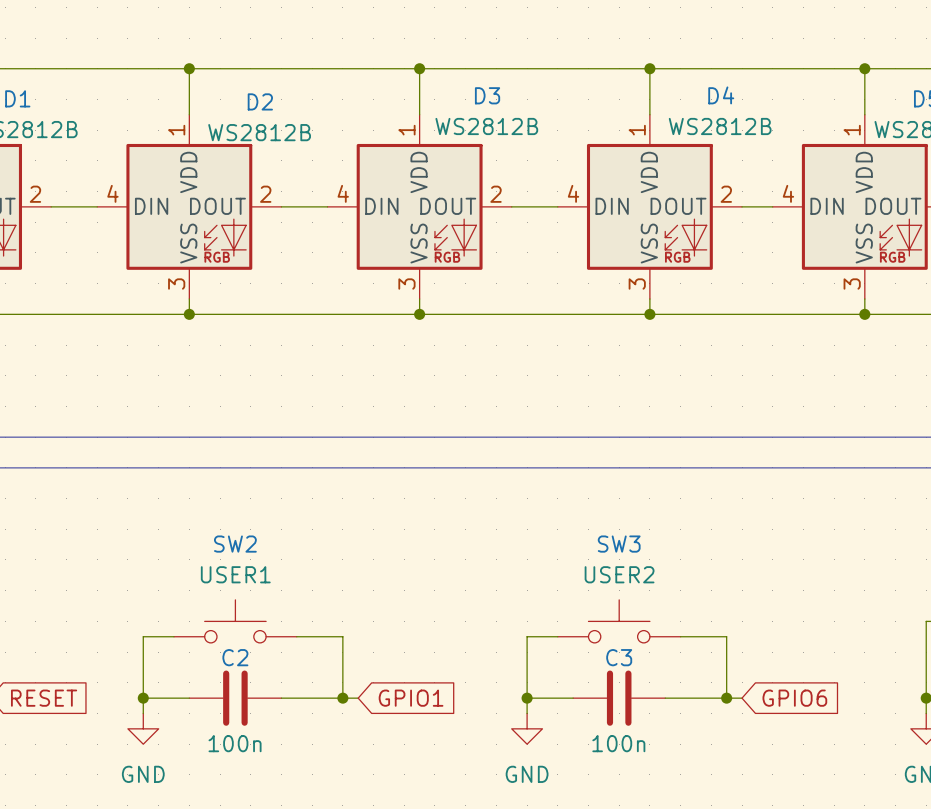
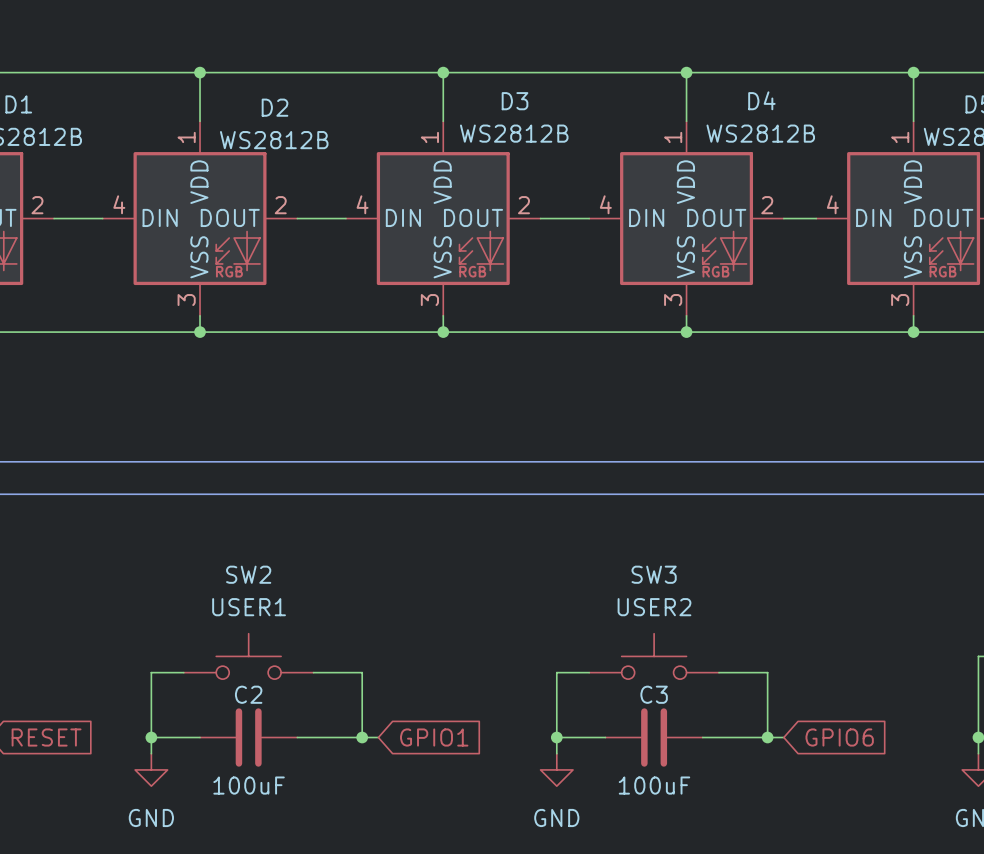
C2 value: 100n (235, 743) -> 100uF (249, 785)
C3 value: 100n (618, 743) -> 100uF (654, 785)

